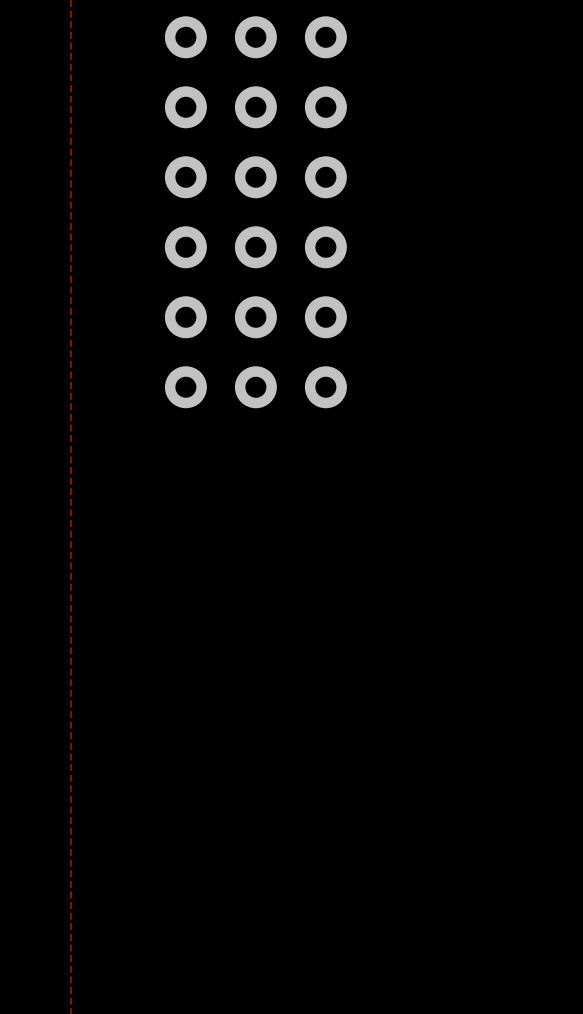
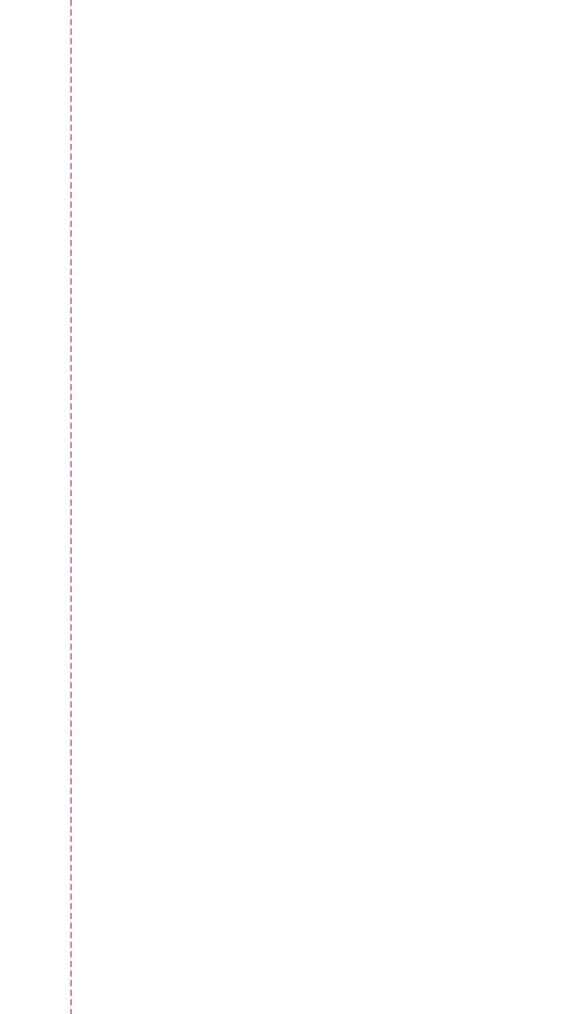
via: (185, 37) -> none
via: (255, 37) -> none
via: (325, 37) -> none
via: (185, 107) -> none
via: (255, 107) -> none
via: (325, 107) -> none
via: (185, 177) -> none
via: (255, 177) -> none
via: (325, 177) -> none
via: (185, 247) -> none
via: (255, 247) -> none
via: (325, 247) -> none
via: (185, 317) -> none
via: (255, 317) -> none
via: (325, 317) -> none
via: (185, 387) -> none
via: (255, 387) -> none
via: (325, 387) -> none

